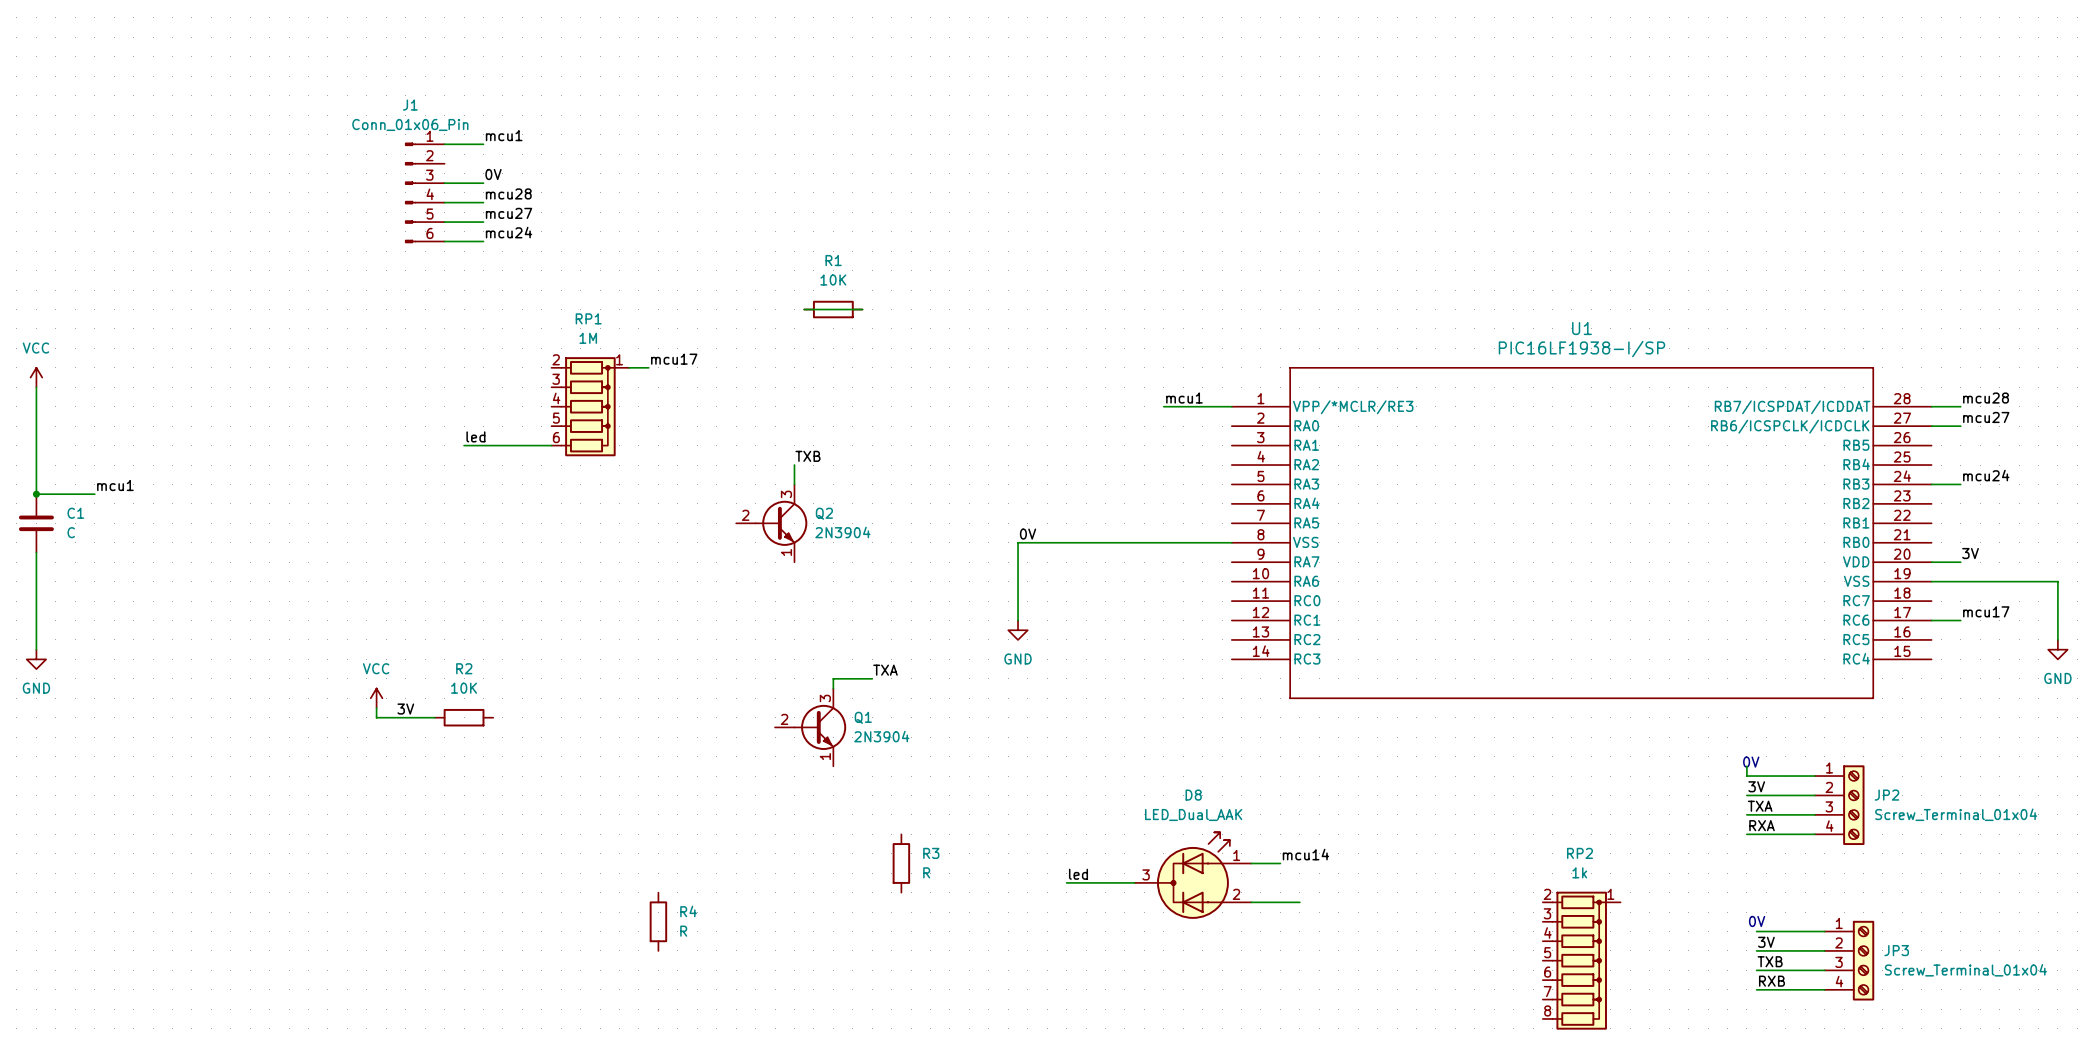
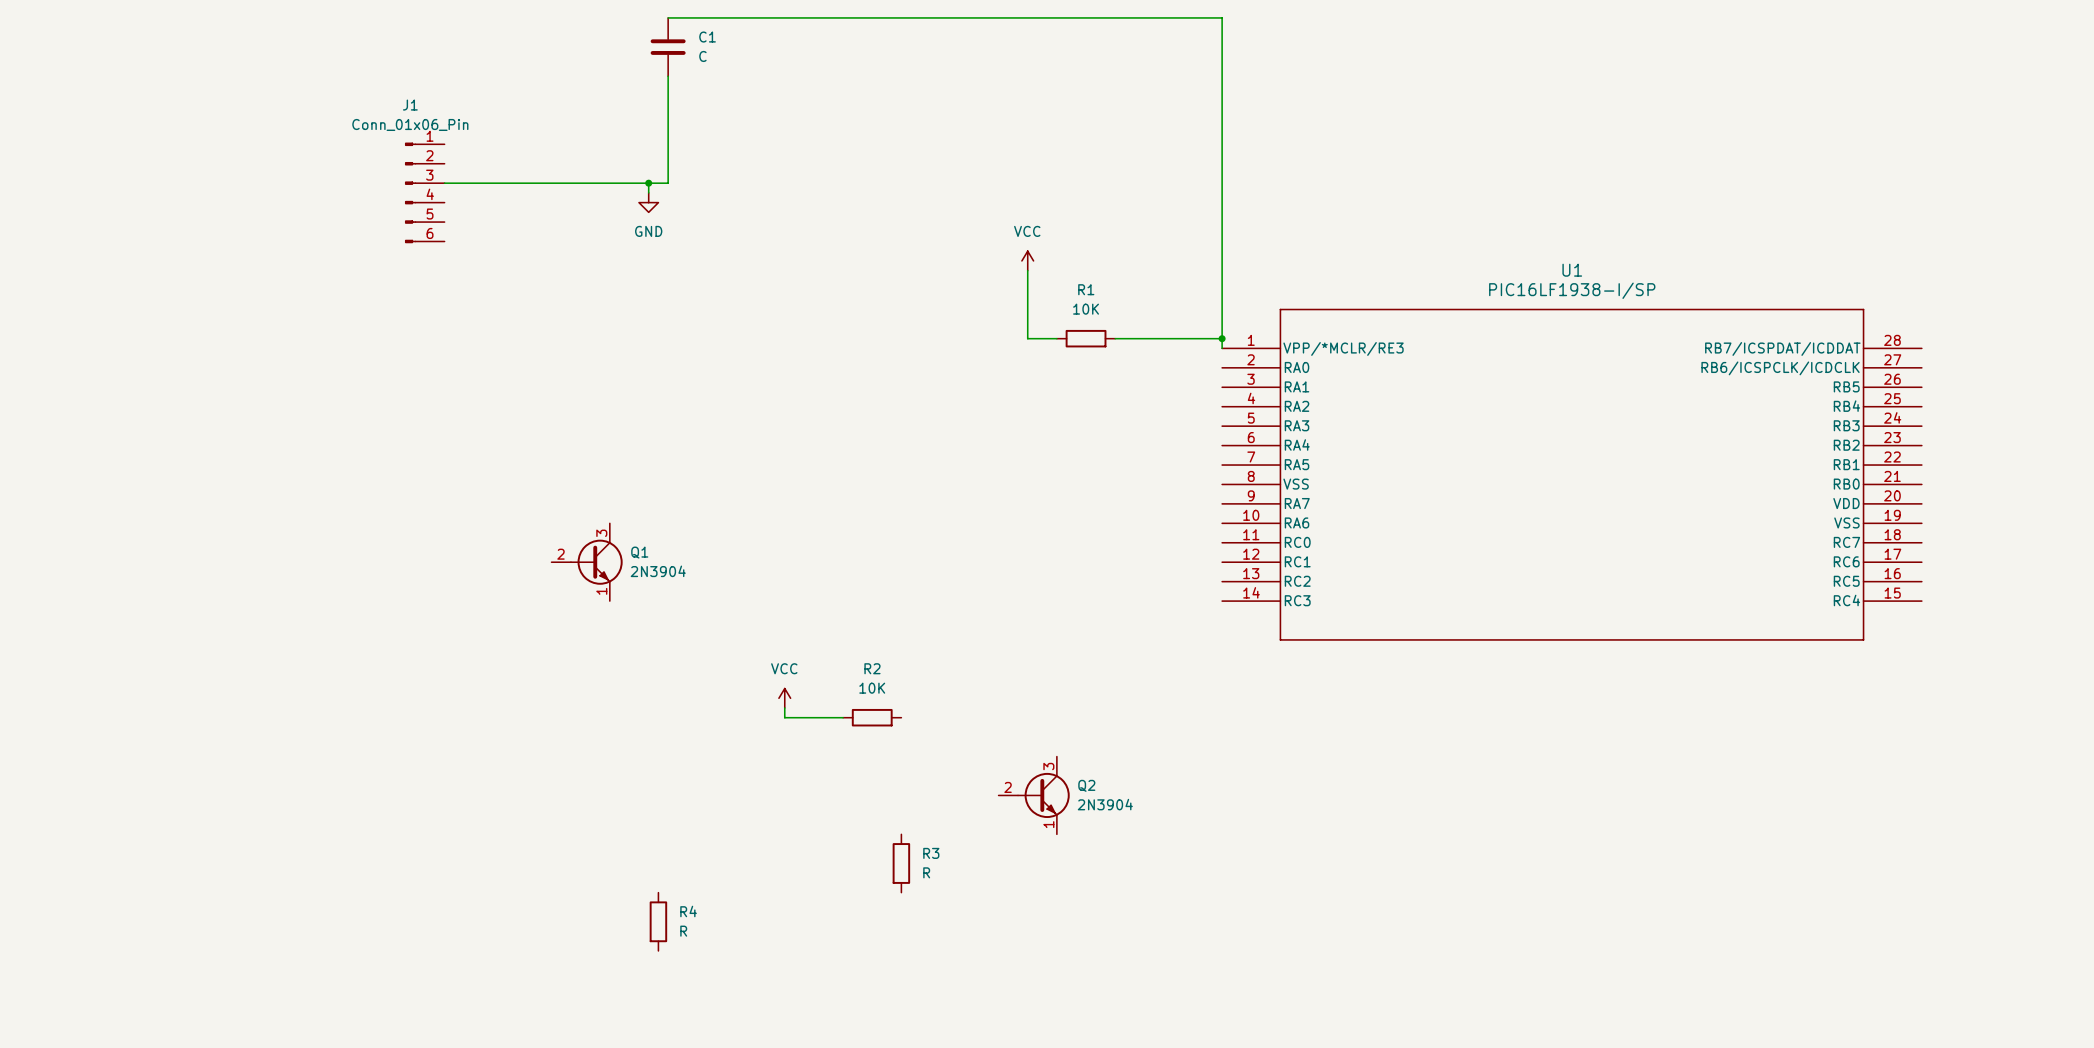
wire: none -> (668, 17) (1222, 17) (1222, 348)
wire: none -> (668, 76) (668, 183) (483, 183)
label: mcu1 (504, 135) -> none
wire: (444, 144) (483, 144) -> none
label: 0V (493, 174) -> none
wire: none -> (648, 183) (648, 192)
junction: none -> (648, 183)
label: mcu28 (508, 193) -> none
wire: (444, 202) (483, 202) -> none
power symbol: none -> GND (648, 202)
label: mcu27 (509, 213) -> none
wire: (444, 222) (483, 222) -> none
label: mcu24 (509, 232) -> none
wire: (444, 241) (483, 241) -> none
power symbol: none -> VCC (1027, 260)
wire: none -> (1027, 270) (1027, 338) (1056, 338)
wire: (804, 309) (862, 309) -> none
R1 position: (833, 309) -> (1086, 338)
wire: none -> (1115, 338) (1222, 338)
junction: none -> (1222, 338)
label: mcu17 (674, 359) -> none
wire: (629, 367) (648, 367) -> none
power symbol: VCC (36, 377) -> none
wire: (36, 387) (36, 494) (94, 494) -> none
label: mcu1 (1184, 398) -> none
label: mcu28 (1986, 398) -> none
RP1: 1M (590, 406) -> none
wire: (1163, 406) (1231, 406) -> none
wire: (1931, 406) (1960, 406) -> none
label: mcu27 (1986, 417) -> none
wire: (1931, 426) (1960, 426) -> none
label: led (475, 436) -> none
wire: (464, 445) (551, 445) -> none
label: TXB (807, 456) -> none
wire: (794, 465) (794, 484) -> none
label: mcu24 (1986, 475) -> none
wire: (1931, 484) (1960, 484) -> none
label: mcu1 (115, 485) -> none
junction: (36, 494) -> none
C1 position: (36, 523) -> (668, 47)
Q2 position: (771, 523) -> (1034, 795)
U1 position: (1581, 533) -> (1571, 474)
label: 0V (1028, 534) -> none
wire: (1231, 542) (1018, 542) (1018, 620) -> none
wire: (36, 552) (36, 649) -> none
label: 3V (1970, 553) -> none
wire: (1931, 562) (1960, 562) -> none
wire: (1931, 581) (2057, 581) (2057, 639) -> none
label: mcu17 (1986, 611) -> none
wire: (1931, 620) (1960, 620) -> none
power symbol: GND (1018, 630) -> none
power symbol: GND (2057, 649) -> none
power symbol: GND (36, 659) -> none
label: TXA (885, 670) -> none
wire: (872, 678) (833, 678) (833, 688) -> none
power symbol: VCC (376, 698) -> none
power symbol: none -> VCC (784, 698)
wire: (376, 707) (376, 717) (434, 717) -> none
wire: none -> (784, 707) (784, 717) (843, 717)
label: 3V (405, 709) -> none
R2 position: (464, 717) -> (872, 717)
Q1 position: (810, 727) -> (587, 562)
text: 0V (1751, 762) -> none
wire: (1746, 766) (1746, 776) (1814, 776) -> none
label: 3V (1756, 786) -> none
wire: (1746, 795) (1814, 795) -> none
JP2: Screw_Terminal_01x04 (1839, 805) -> none
label: TXA (1760, 806) -> none
wire: (1746, 814) (1814, 814) -> none
label: RXA (1762, 825) -> none
wire: (1746, 834) (1814, 834) -> none
label: mcu14 (1305, 854) -> none
wire: (1251, 863) (1280, 863) -> none
label: led (1078, 874) -> none
D8: LED_Dual_AAK (1192, 875) -> none
wire: (1066, 882) (1134, 882) -> none
wire: (1251, 902) (1299, 902) -> none
text: 0V (1757, 921) -> none
wire: (1756, 931) (1824, 931) -> none
label: 3V (1766, 942) -> none
wire: (1756, 950) (1824, 950) -> none
RP2: 1k (1581, 960) -> none
JP3: Screw_Terminal_01x04 (1849, 960) -> none
label: TXB (1770, 961) -> none
wire: (1756, 970) (1824, 970) -> none
label: RXB (1771, 981) -> none
wire: (1756, 989) (1824, 989) -> none

